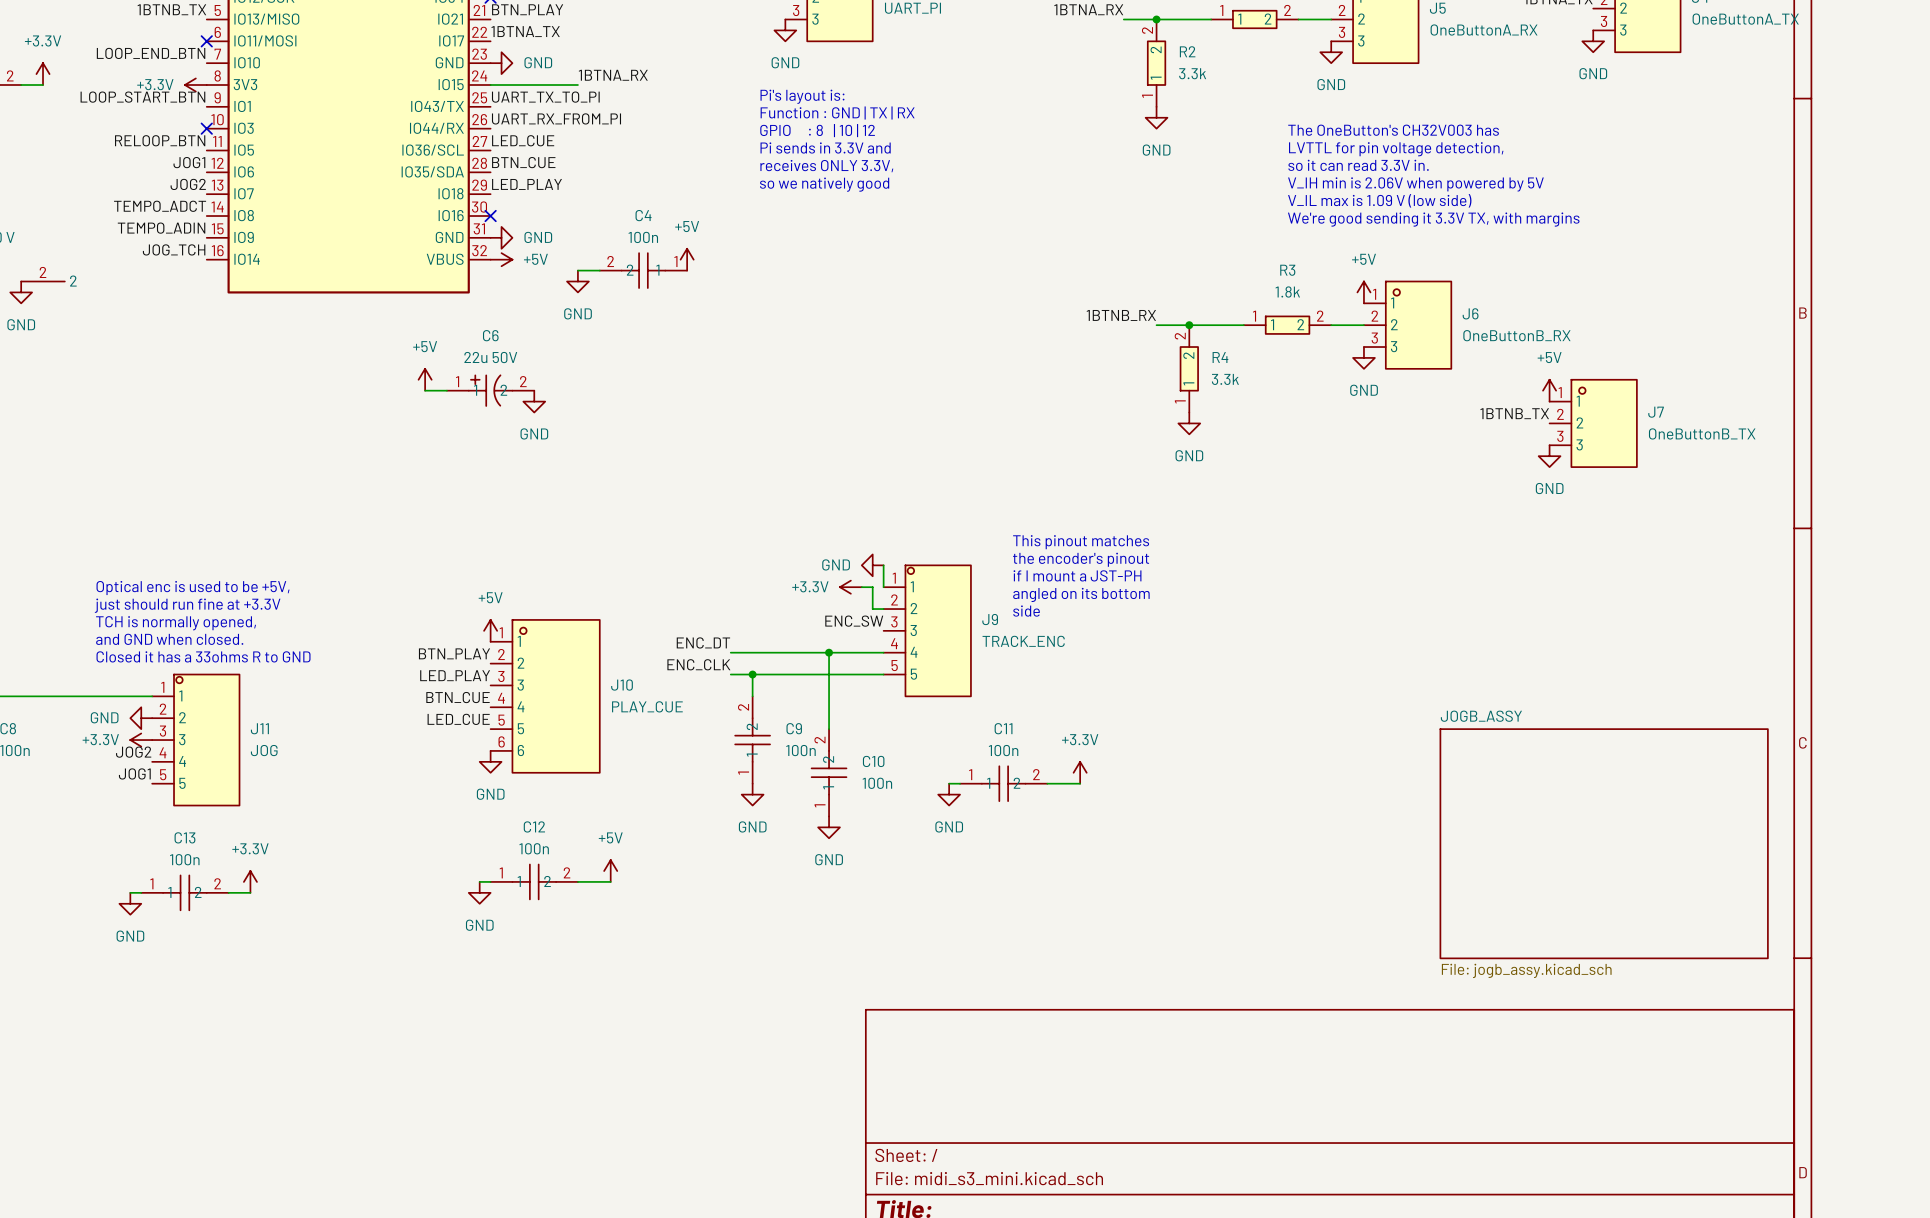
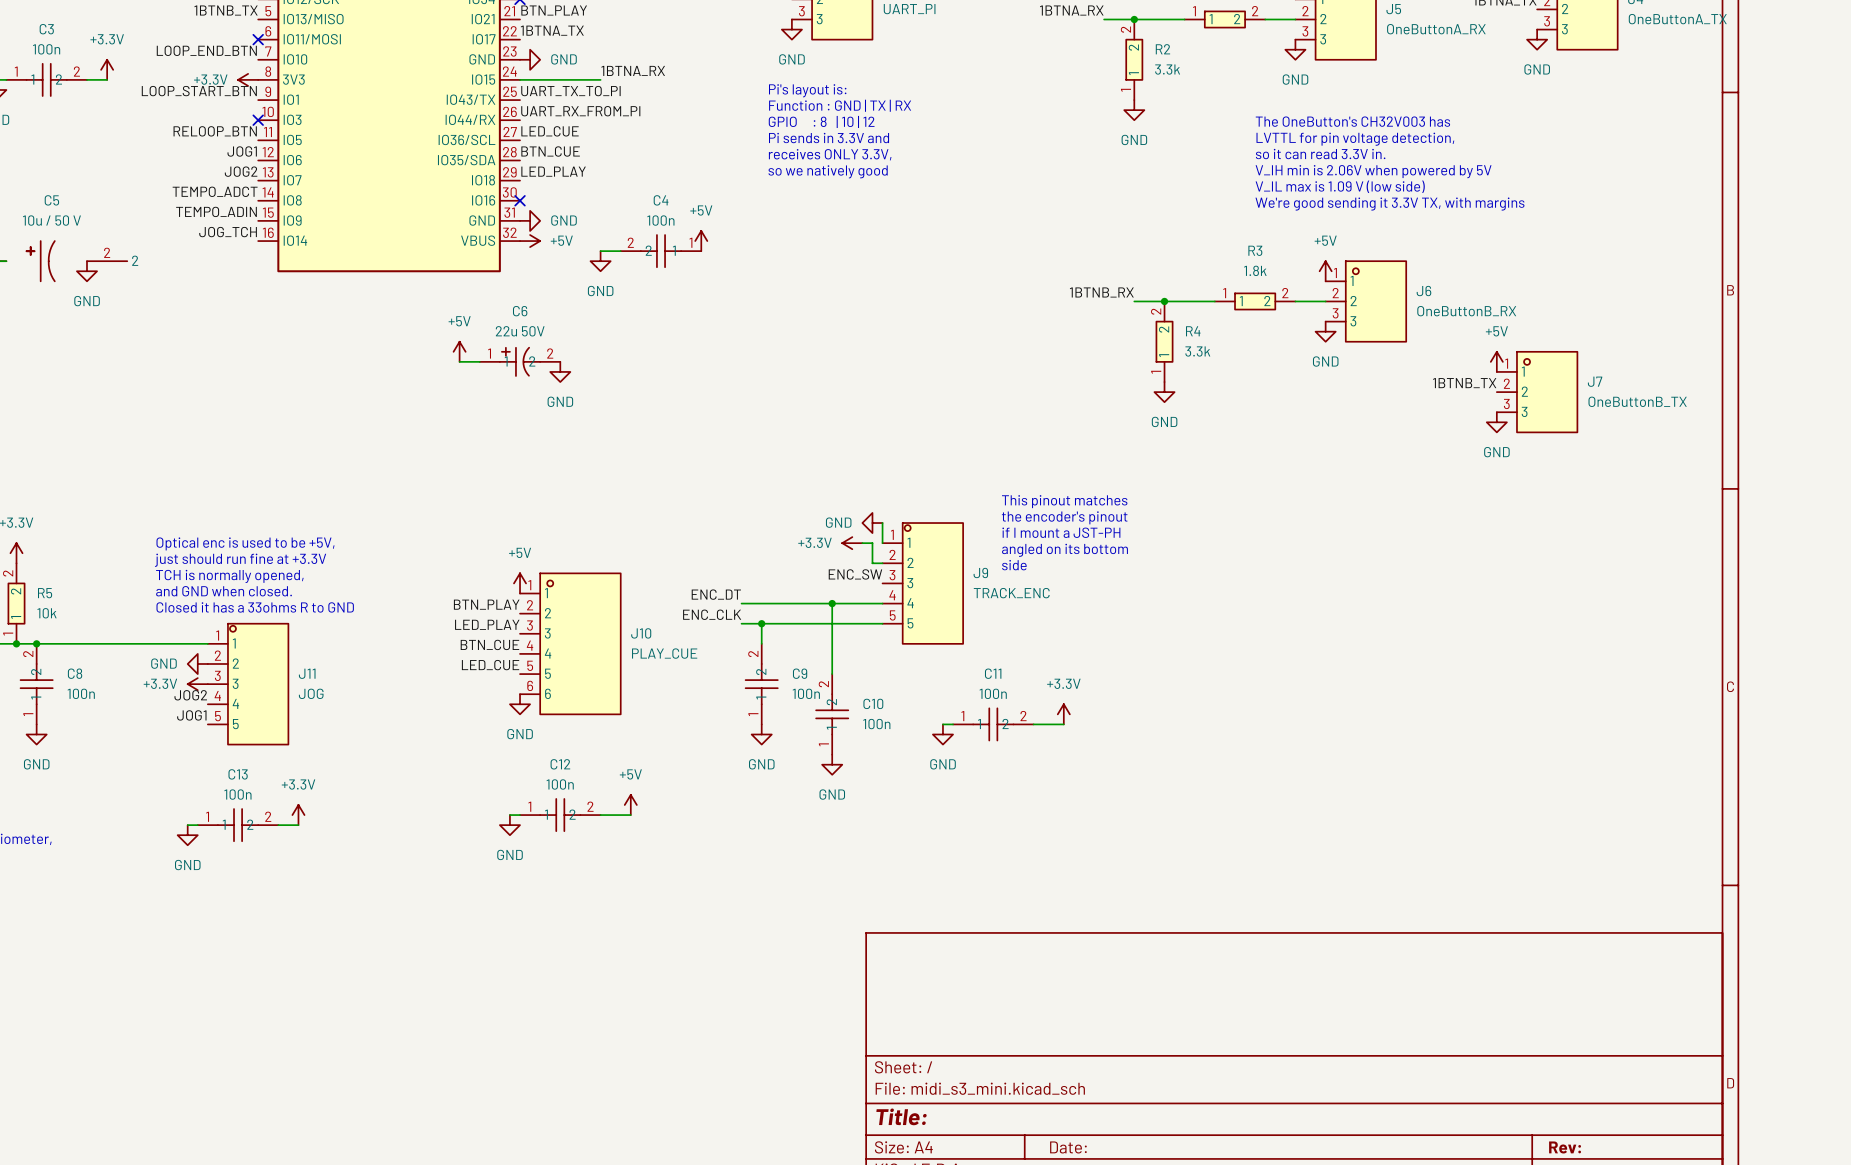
sheet JOGB_ASSY: File: jogb_assy.kicad_sch (1604, 843) -> none

